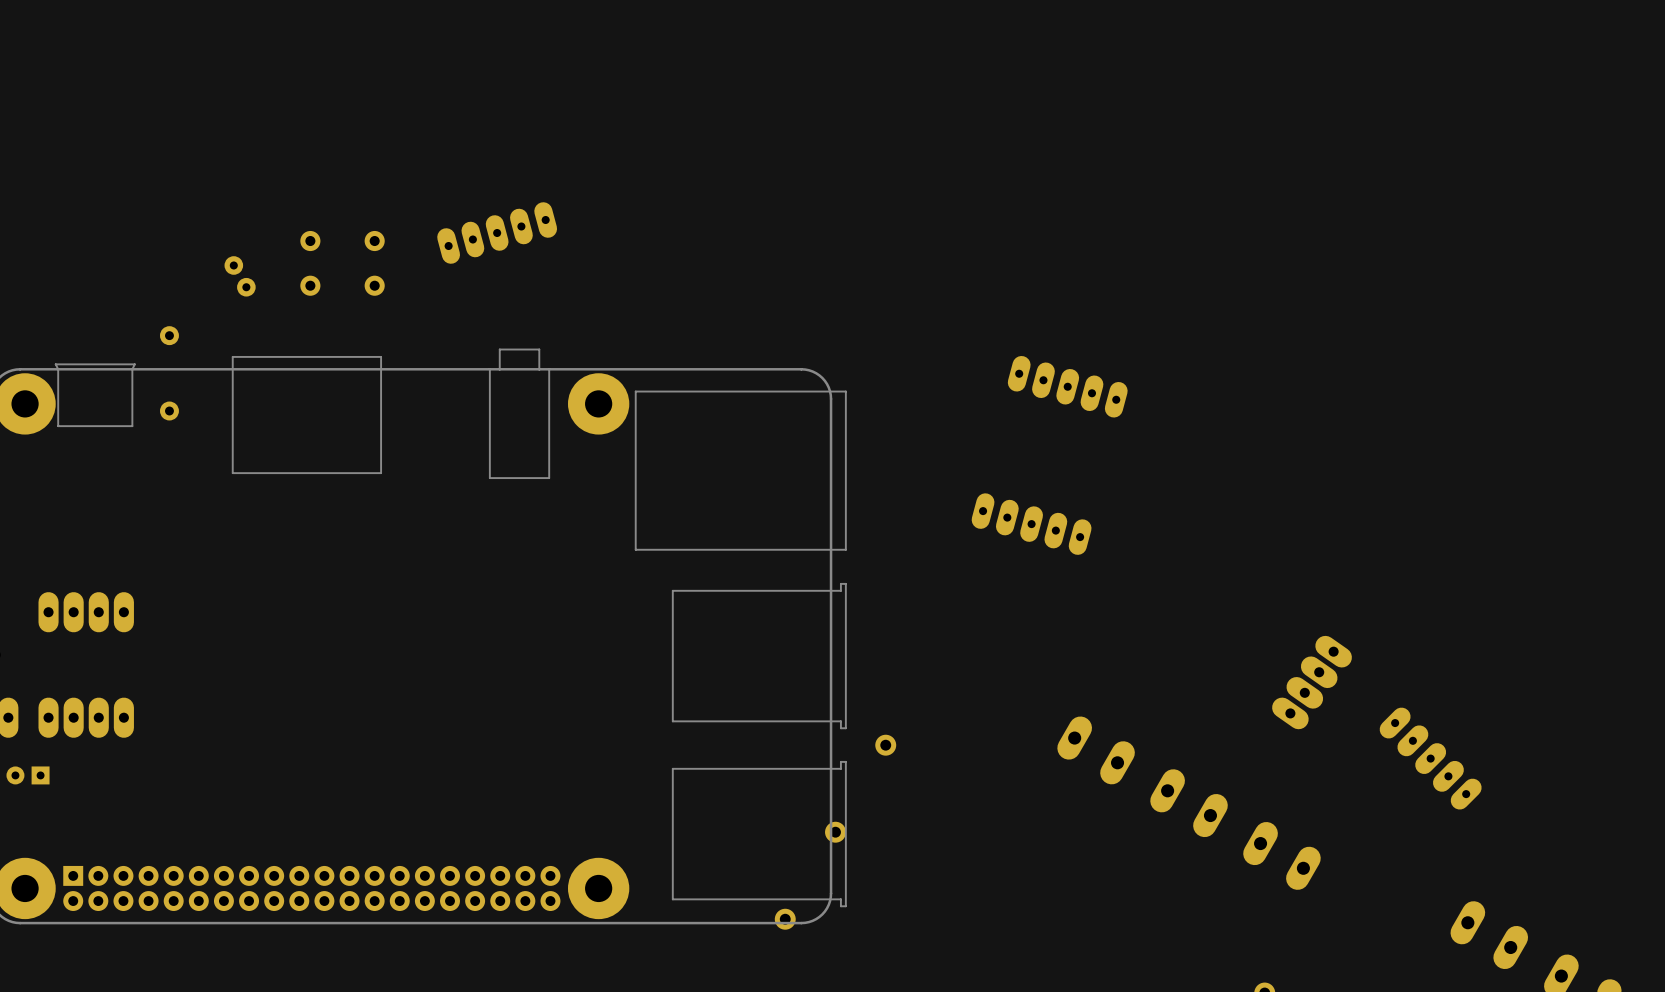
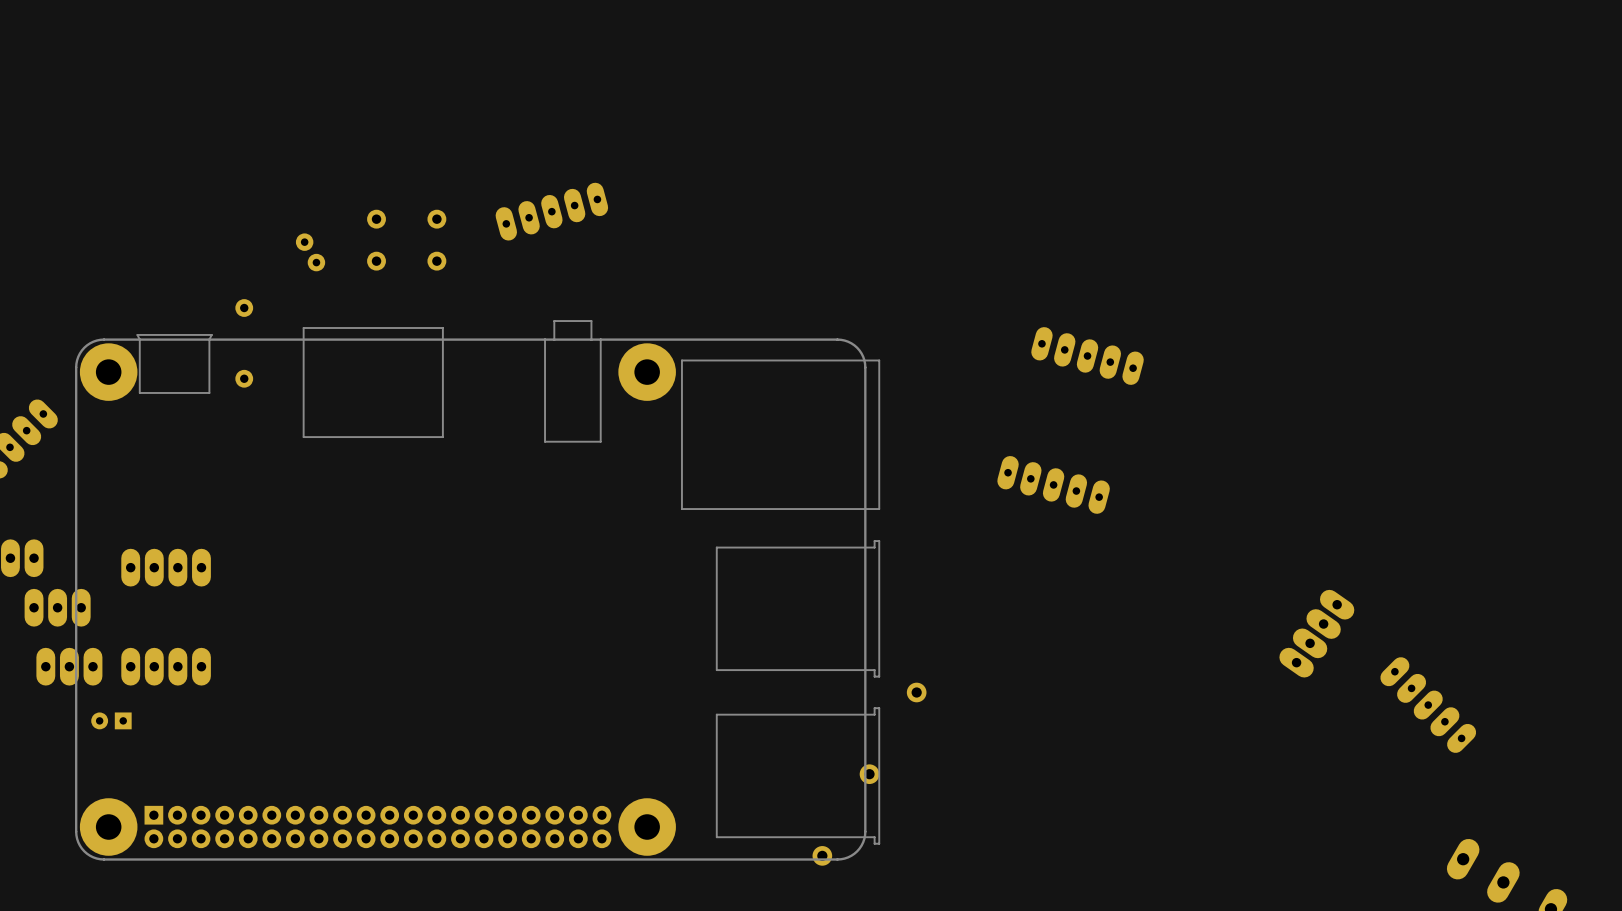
part: (1096, 750) -> none
part: (1189, 803) -> none
part: (1281, 855) -> none

